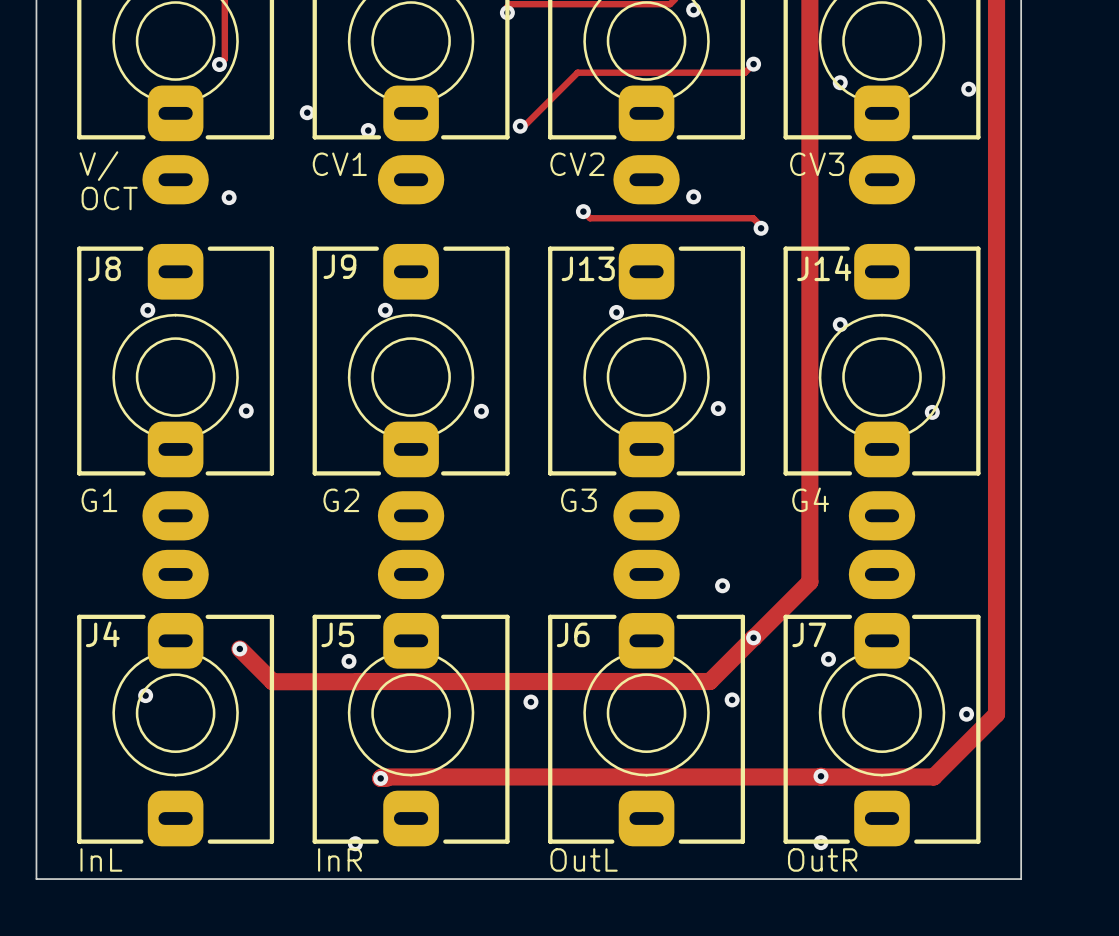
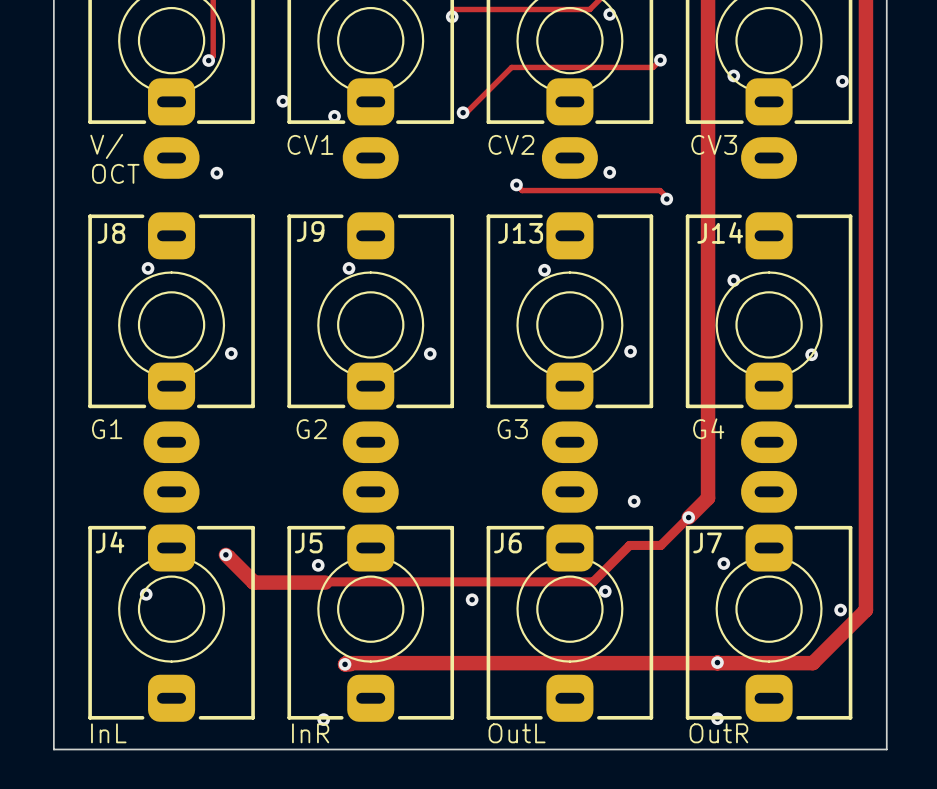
track width: thick (786, 604) (753, 637) -> thin (688, 517) (660, 545)
via: none -> (688, 517)
track: (753, 637) (709, 681) (357, 681) -> (660, 545) (629, 545) (593, 581) (257, 581) (230, 554) (225, 554)
via: (753, 637) -> none
via: none -> (605, 591)
via: (732, 699) -> none

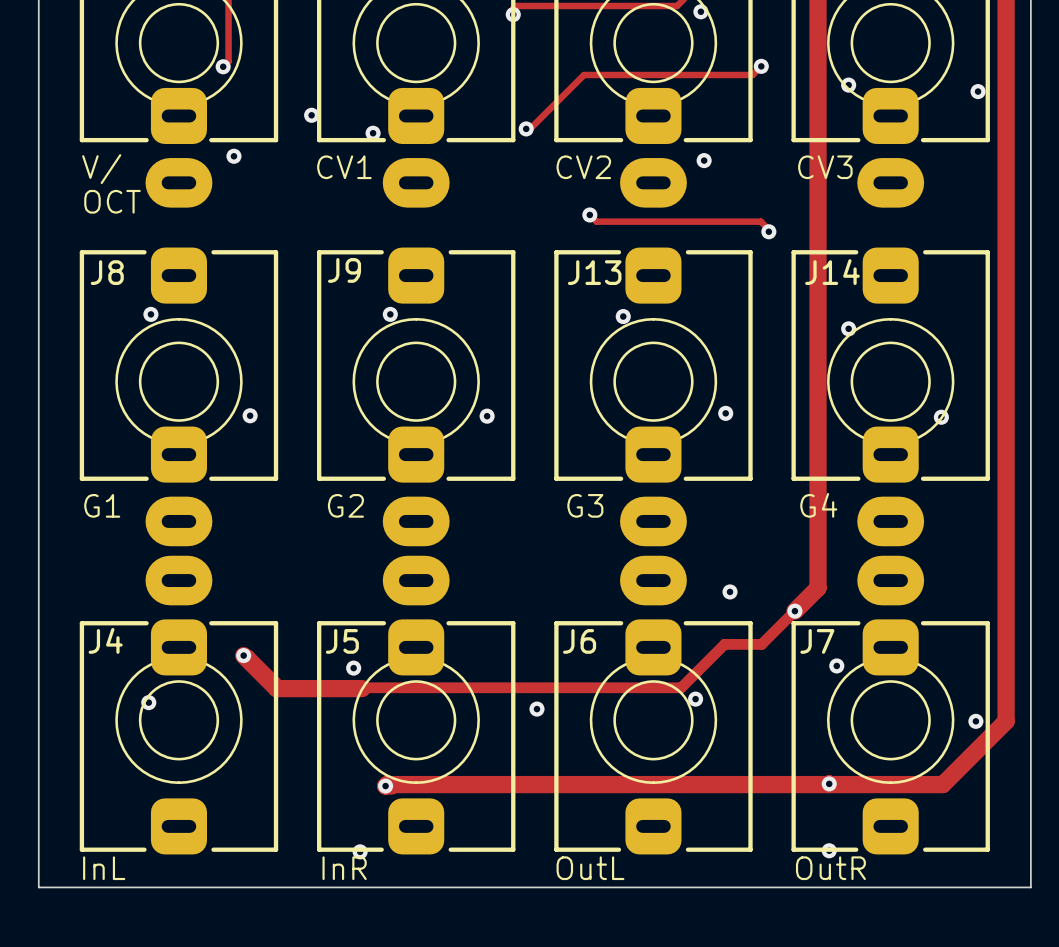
via position: (609, 172) -> (704, 160)
via position: (216, 173) -> (233, 156)

